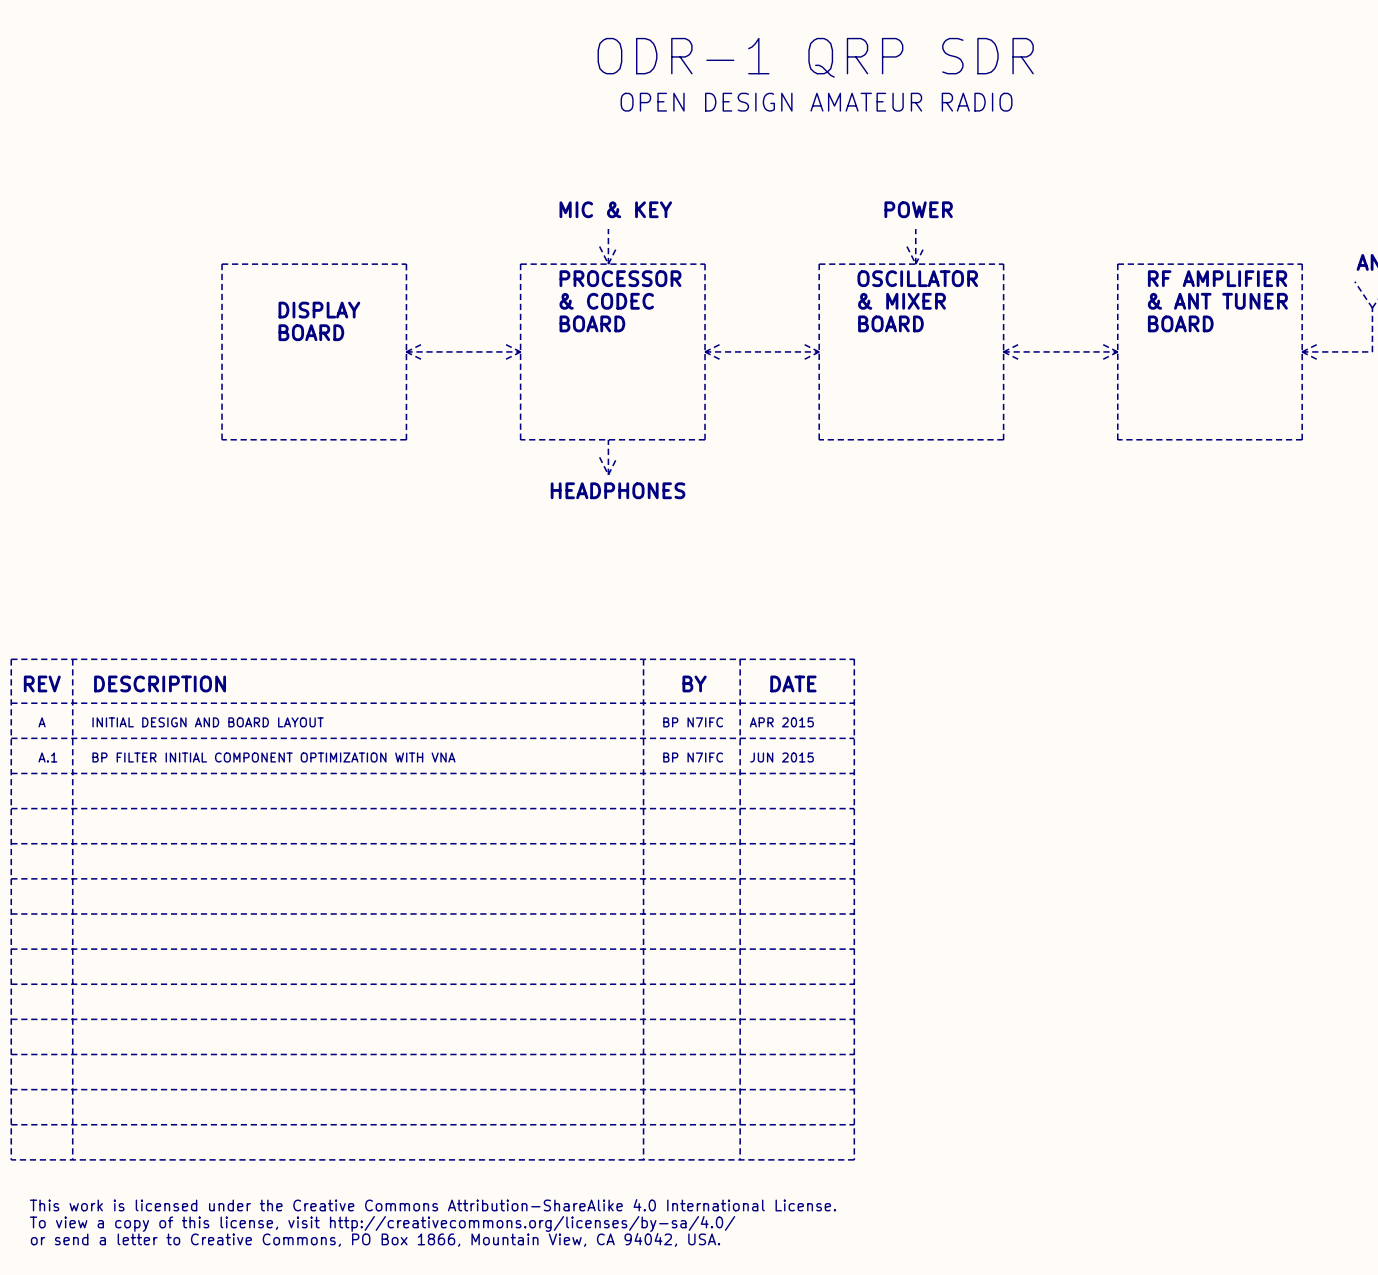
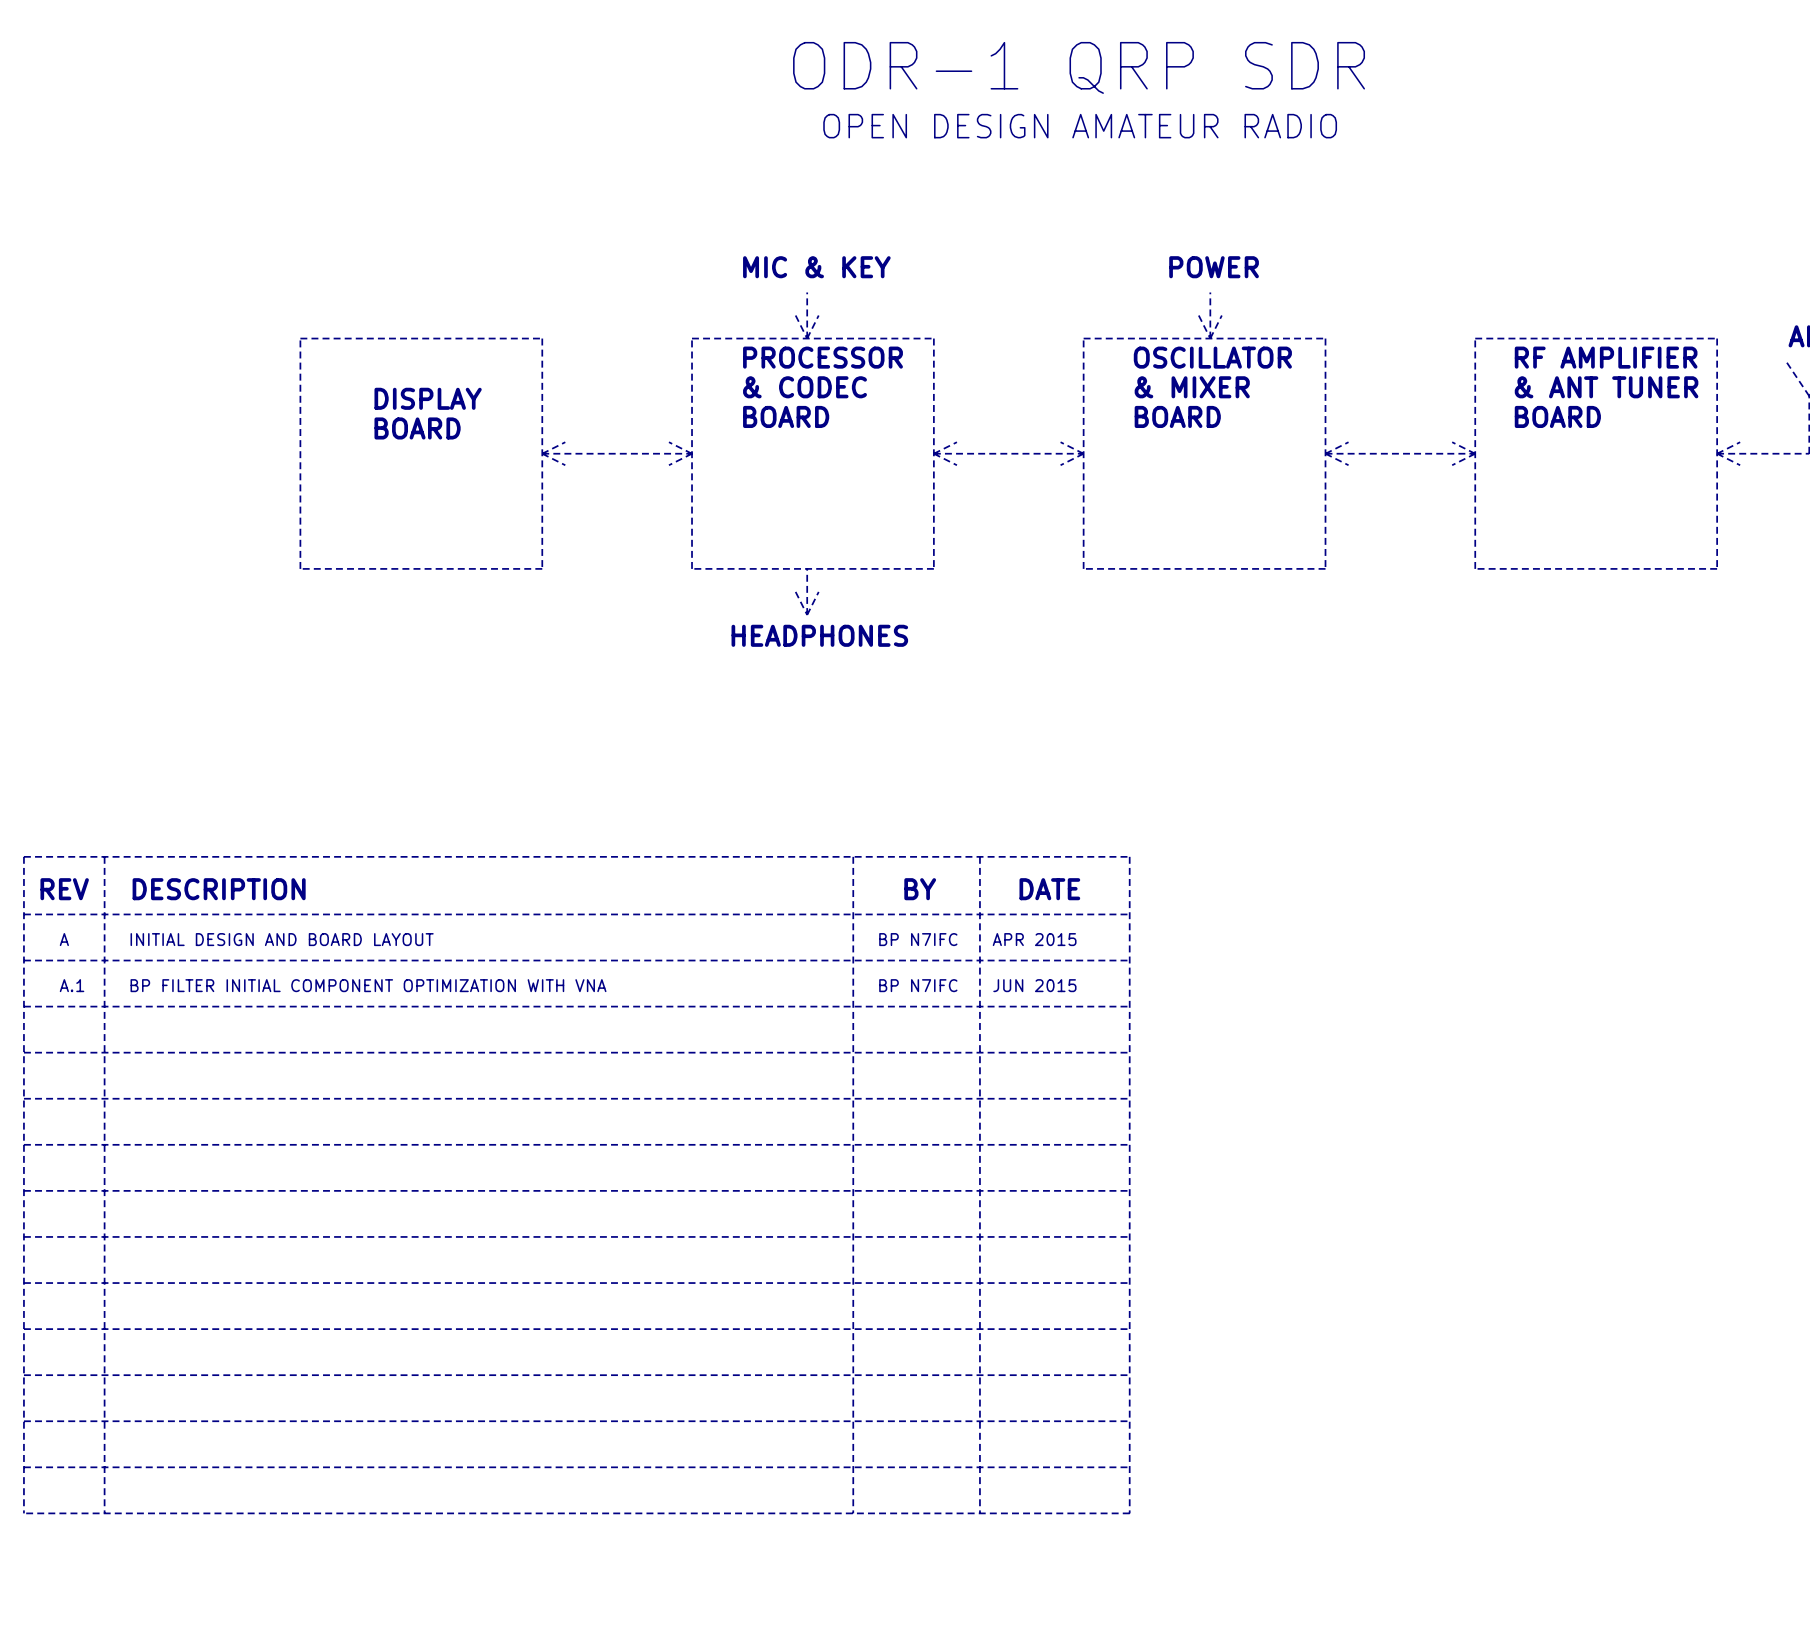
text: This work is licensed under the Creative Commons Attribution-ShareAlike 4.0 International License. (432, 1205) -> none
text: To view a copy of this license, visit http://creativecommons.org/licenses/by-sa/4.0/ (382, 1223) -> none
text: or send a letter to Creative Commons, PO Box 1866, Mountain View, CA 94042, USA. (375, 1239) -> none

